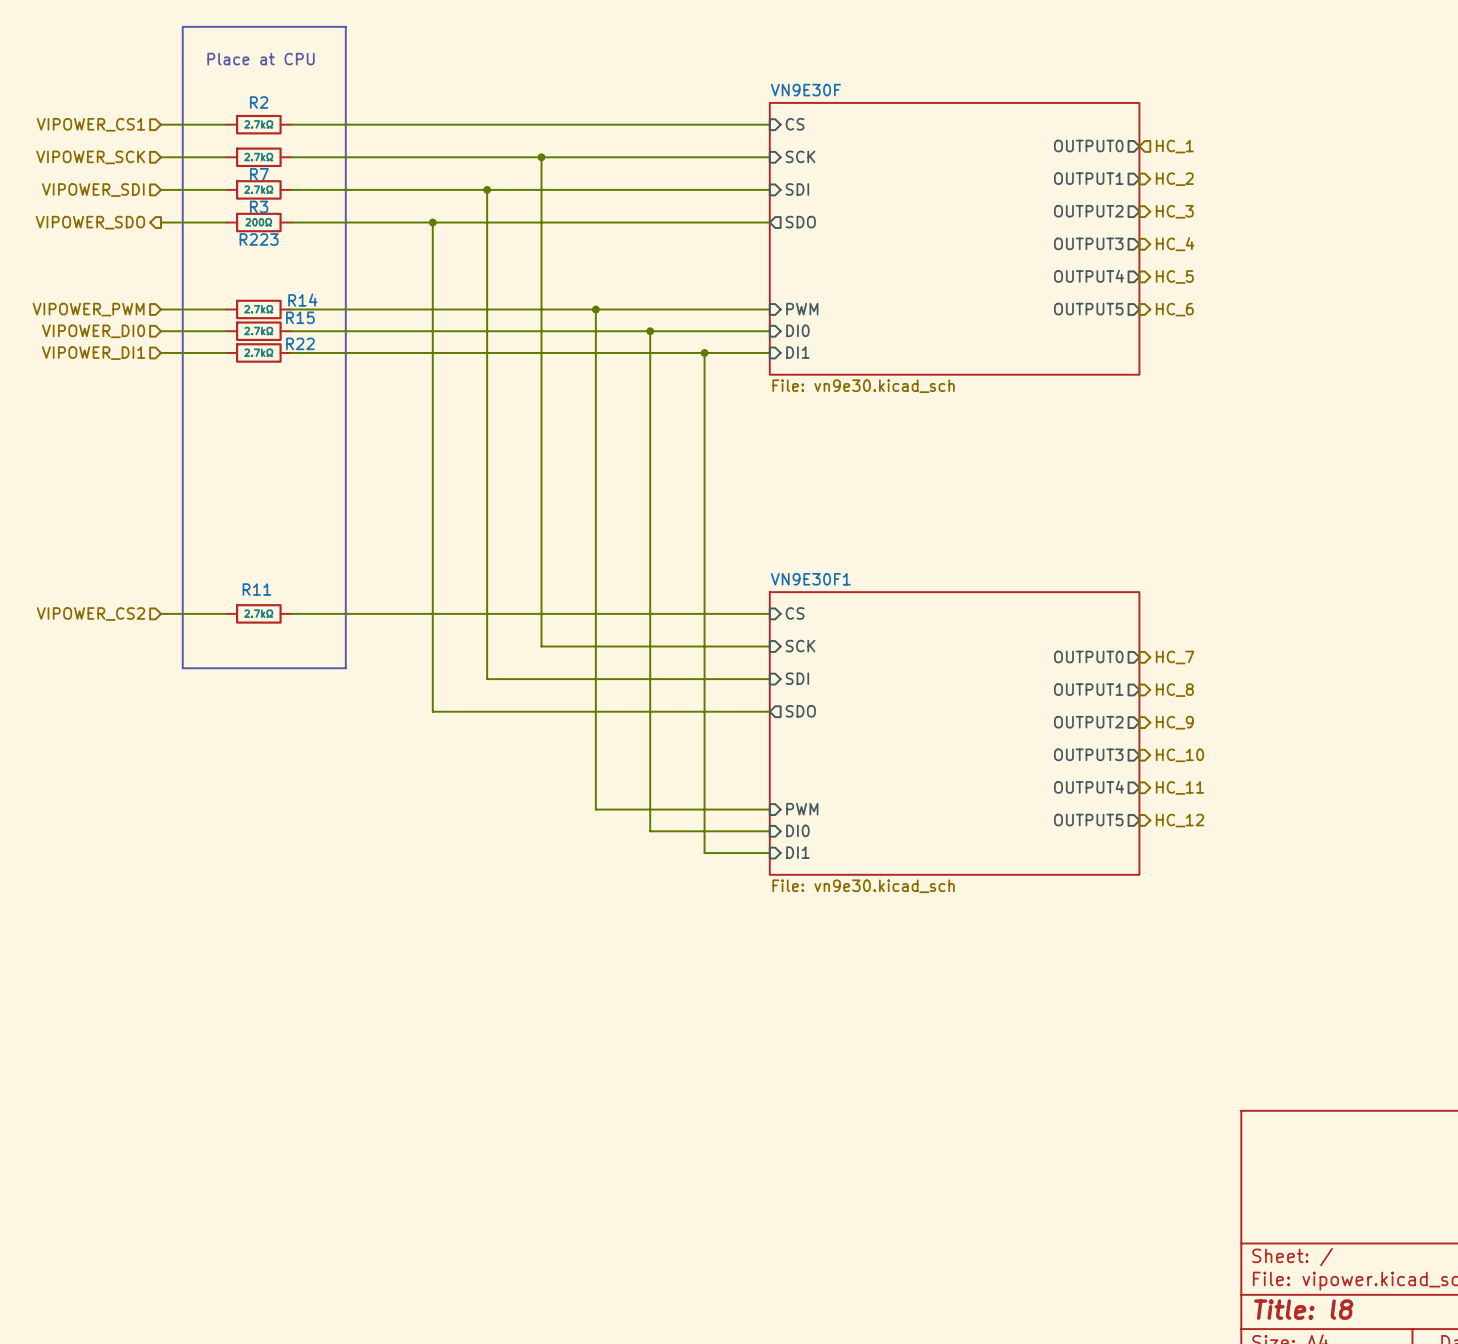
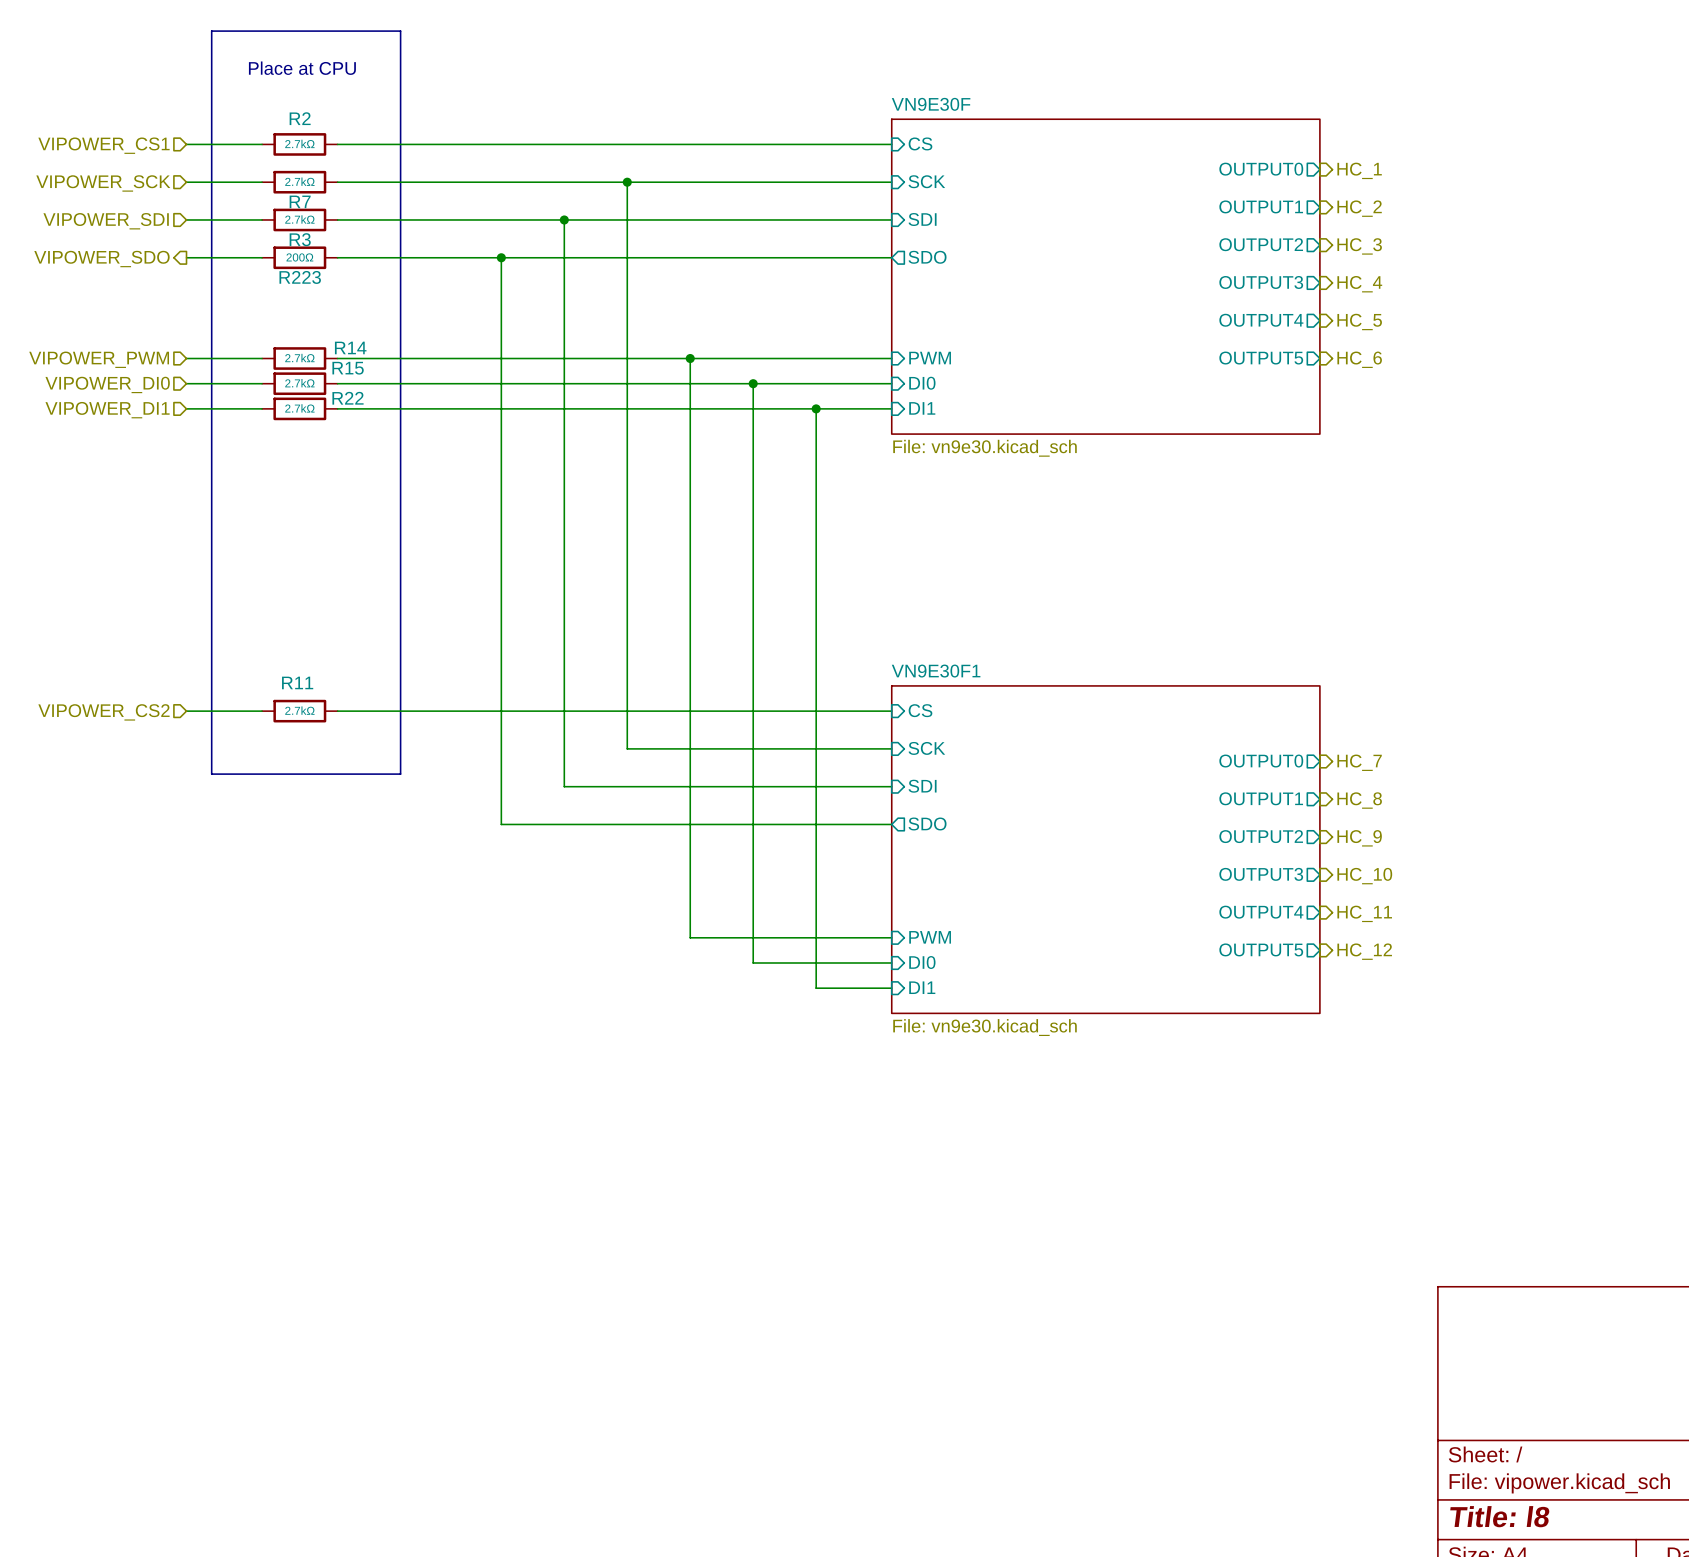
hierarchical label shape: input (1174, 146) -> output (1359, 170)

